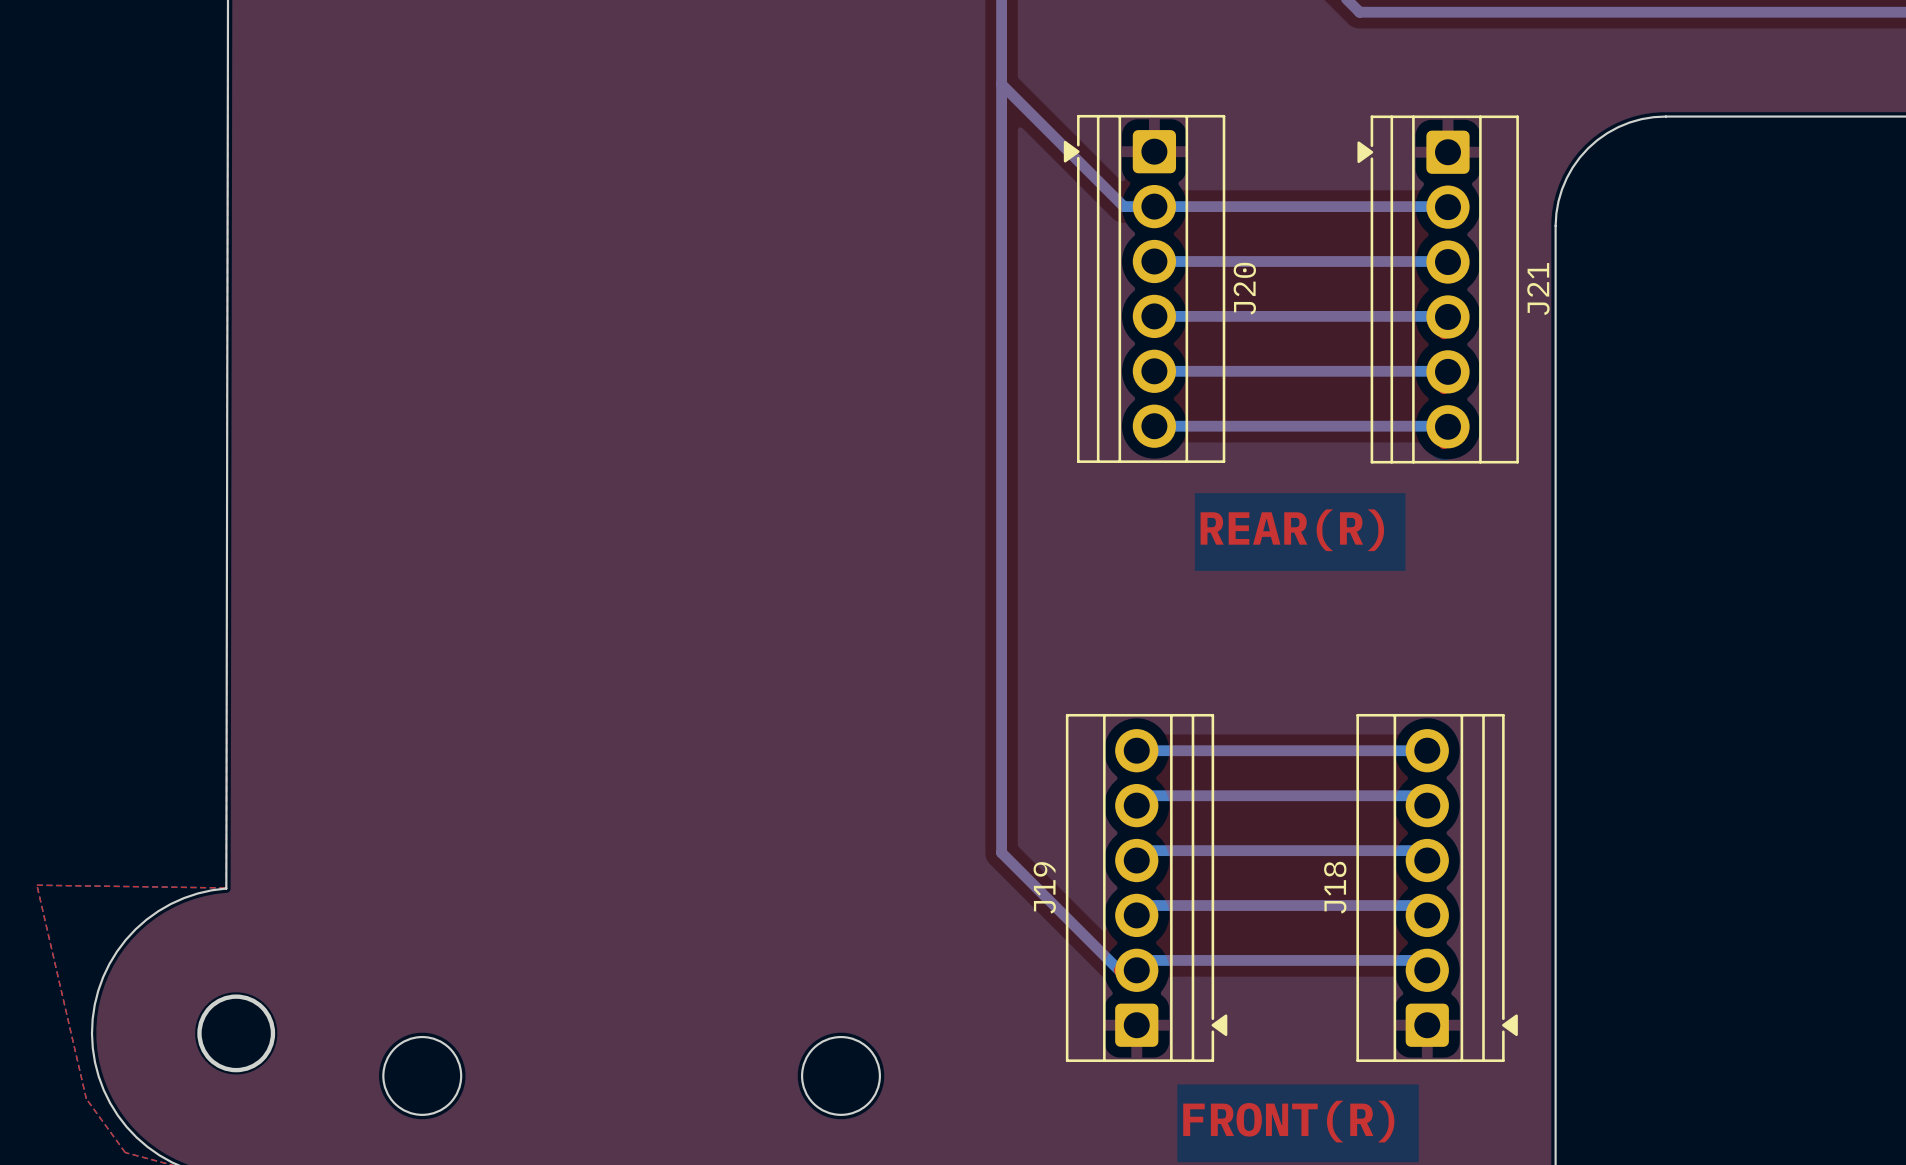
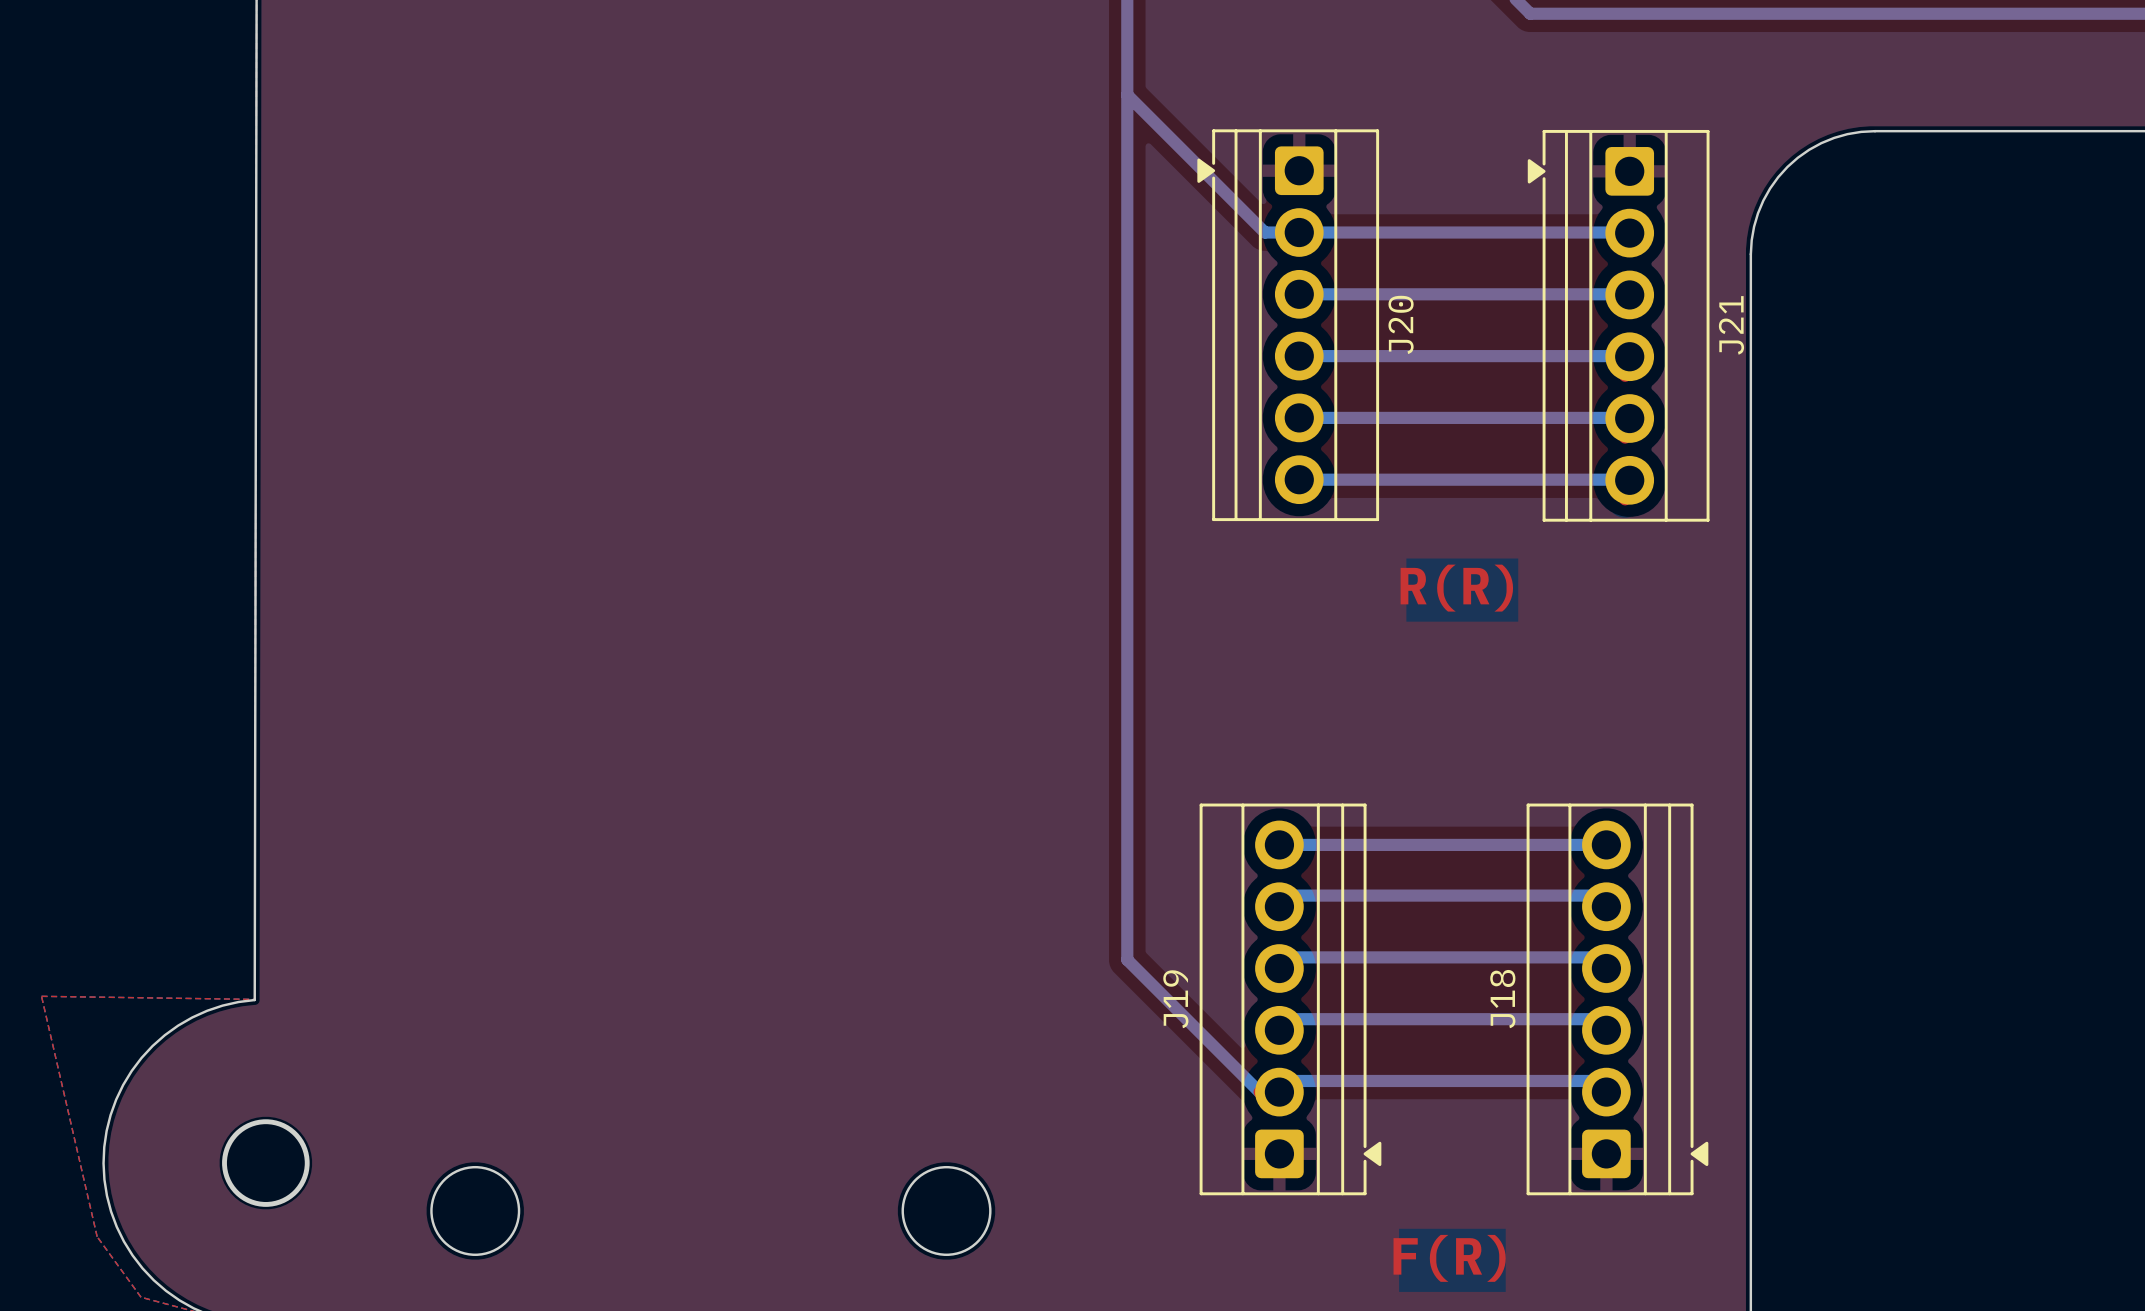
text: REAR(R) (1292, 530) -> R(R) (1456, 588)
text: FRONT(R) (1288, 1121) -> F(R) (1449, 1258)

